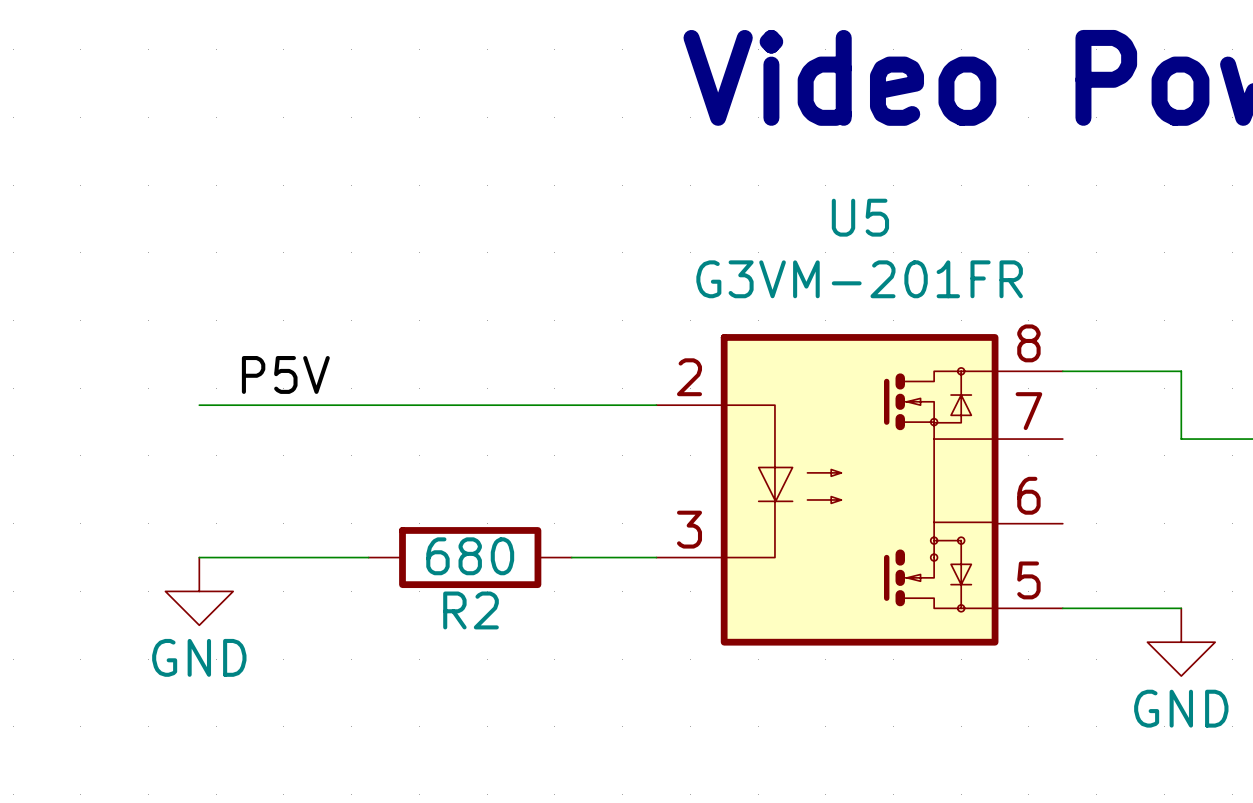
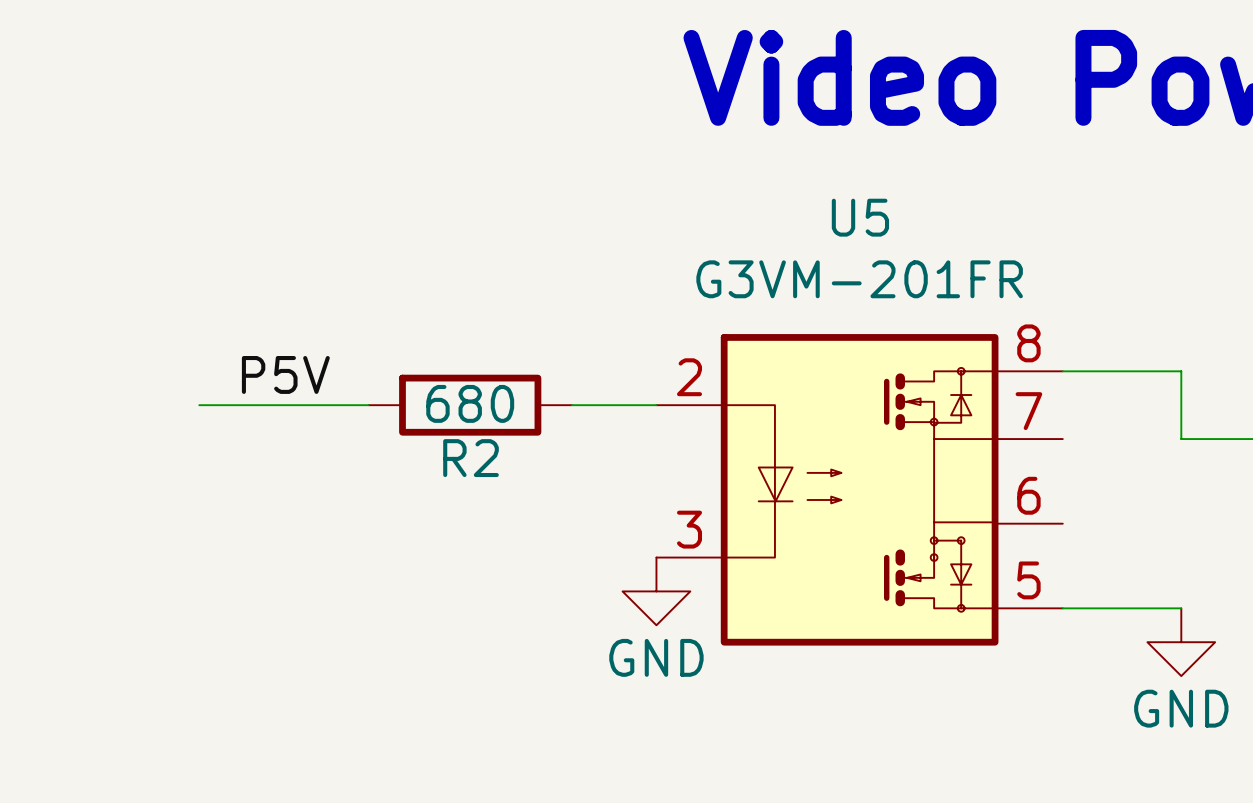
wire: (368, 405) (571, 405) -> none
wire: (199, 557) (368, 557) -> none
R2 position: (470, 557) -> (470, 405)
wire: (571, 557) (656, 557) -> none
power symbol position: GND (199, 591) -> GND (656, 591)

